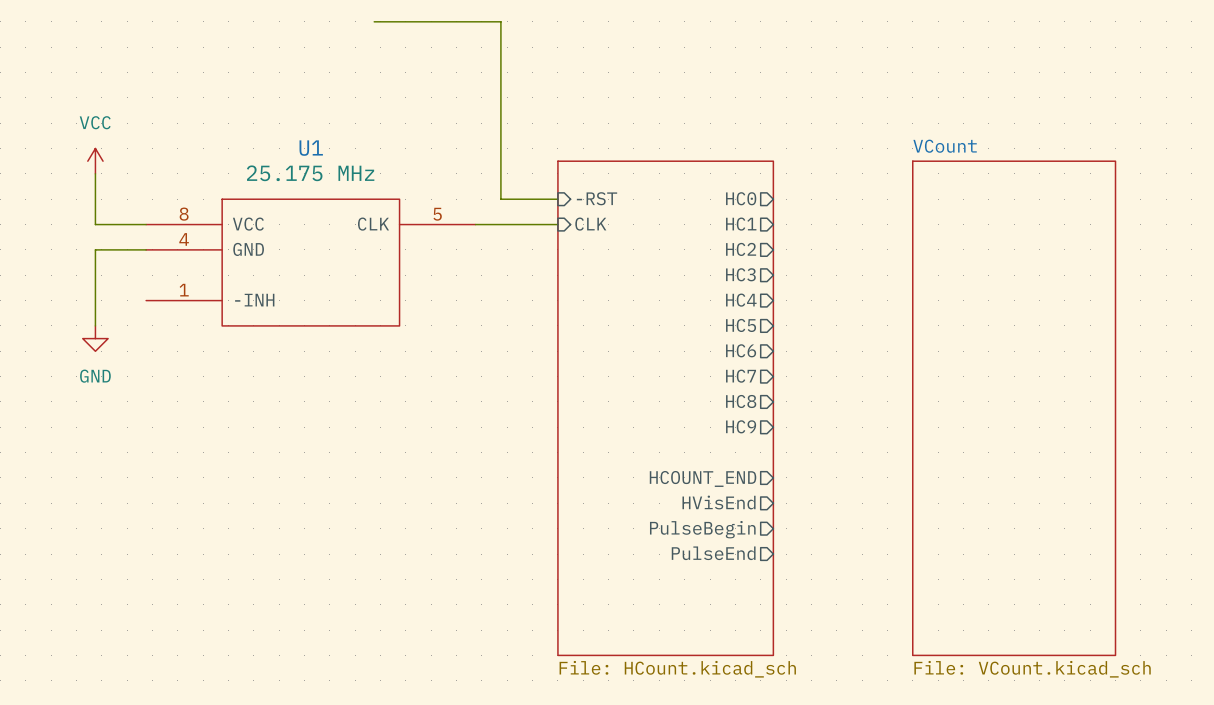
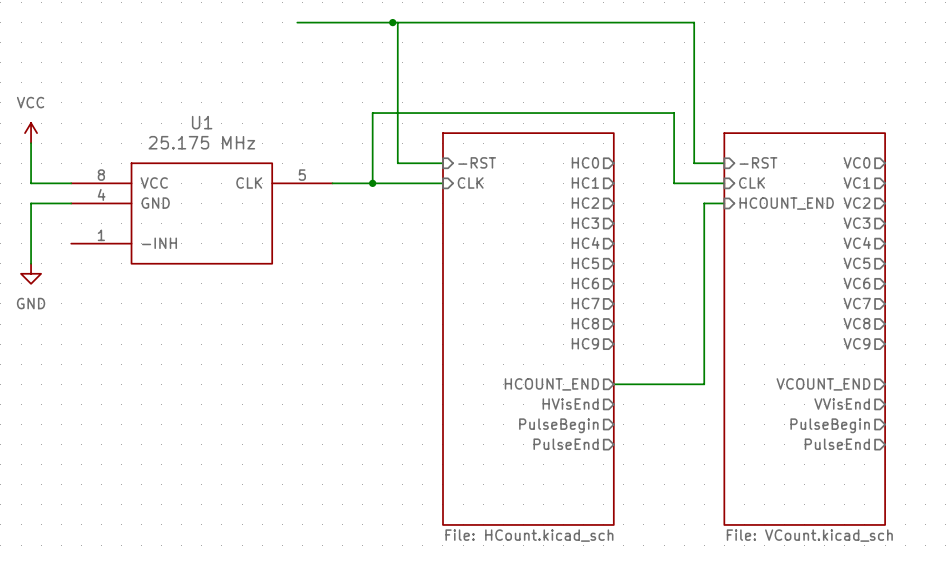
junction: none -> (392, 22)
wire: none -> (397, 22) (694, 22) (694, 163) (724, 163)
sheet VCount name: VCount (945, 146) -> none
power symbol position: VCC (95, 161) -> VCC (31, 133)
wire: (95, 173) (95, 224) (146, 224) -> (31, 143) (31, 183) (71, 183)
sheet pin: none -> -RST (758, 162)
sheet pin: none -> VC0 (856, 162)
wire: none -> (372, 183) (372, 113) (674, 113) (674, 183) (724, 183)
junction: none -> (372, 183)
sheet pin: none -> CLK (751, 182)
sheet pin: none -> VC1 (856, 182)
wire: (146, 249) (95, 249) (95, 325) -> (71, 203) (31, 203) (31, 263)
wire: none -> (724, 203) (704, 203) (704, 384) (613, 384)
sheet pin: none -> VC2 (856, 203)
sheet pin: none -> HCOUNT_END (786, 203)
U1 position: (310, 262) -> (201, 213)
sheet pin: none -> VC3 (856, 223)
sheet pin: none -> VC4 (857, 243)
sheet pin: none -> VC5 (856, 263)
power symbol position: GND (95, 338) -> GND (31, 273)
sheet pin: none -> VC6 (856, 283)
sheet pin: none -> VC7 (857, 303)
sheet pin: none -> VC8 (856, 323)
sheet pin: none -> VC9 (856, 343)
sheet pin: none -> VCOUNT_END (823, 384)
sheet pin: none -> VVisEnd (842, 404)
sheet pin: none -> PulseBegin (830, 425)
sheet pin: none -> PulseEnd (837, 444)

